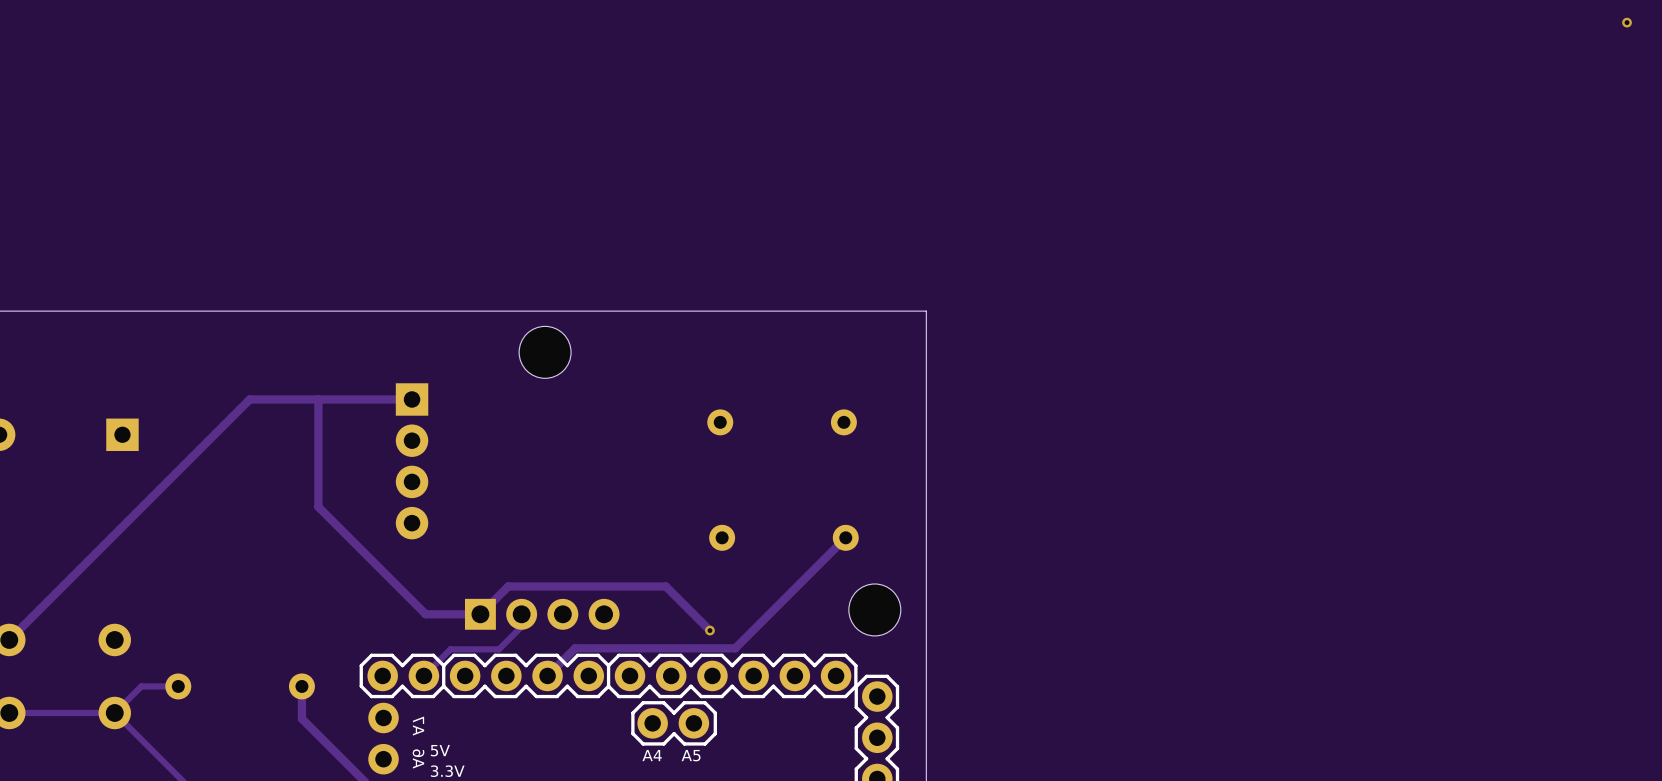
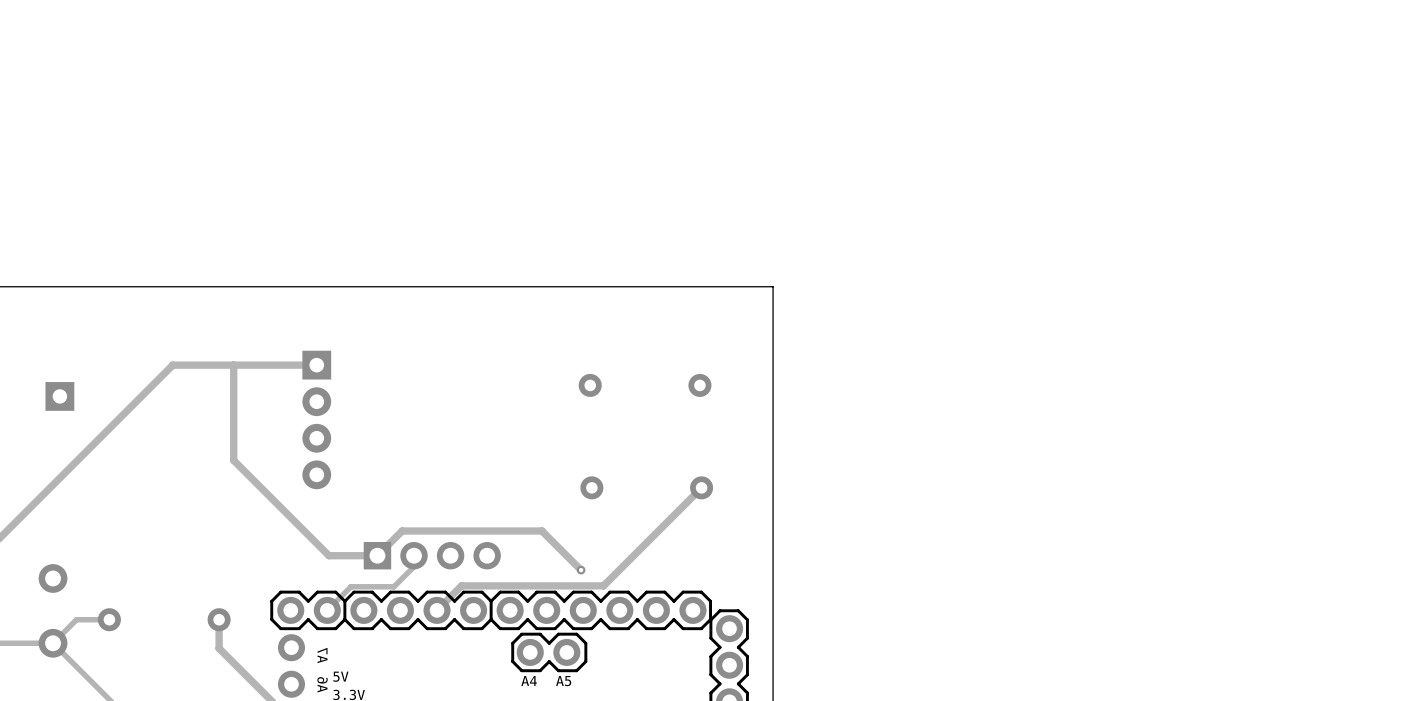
via: (1627, 22) -> none
part: (545, 352) -> none
part: (874, 609) -> none

